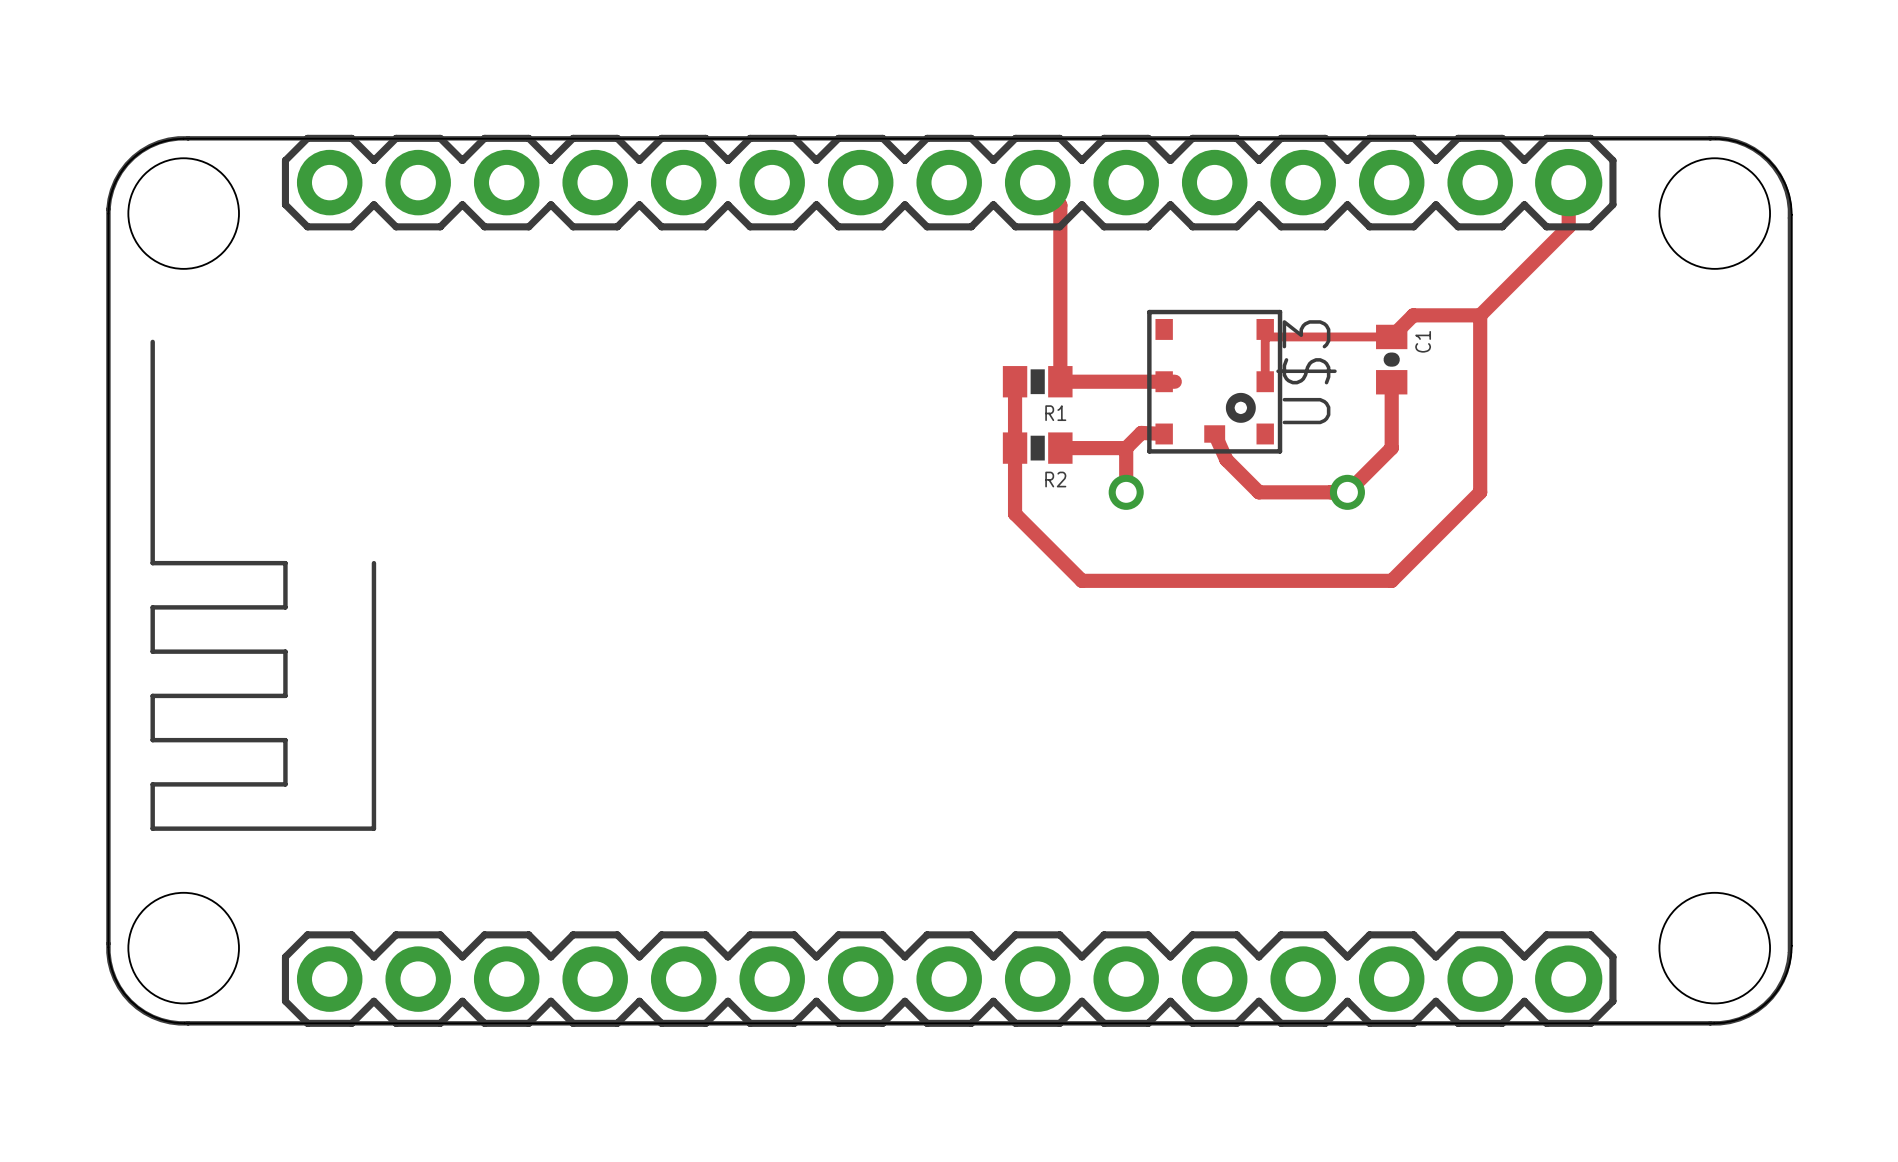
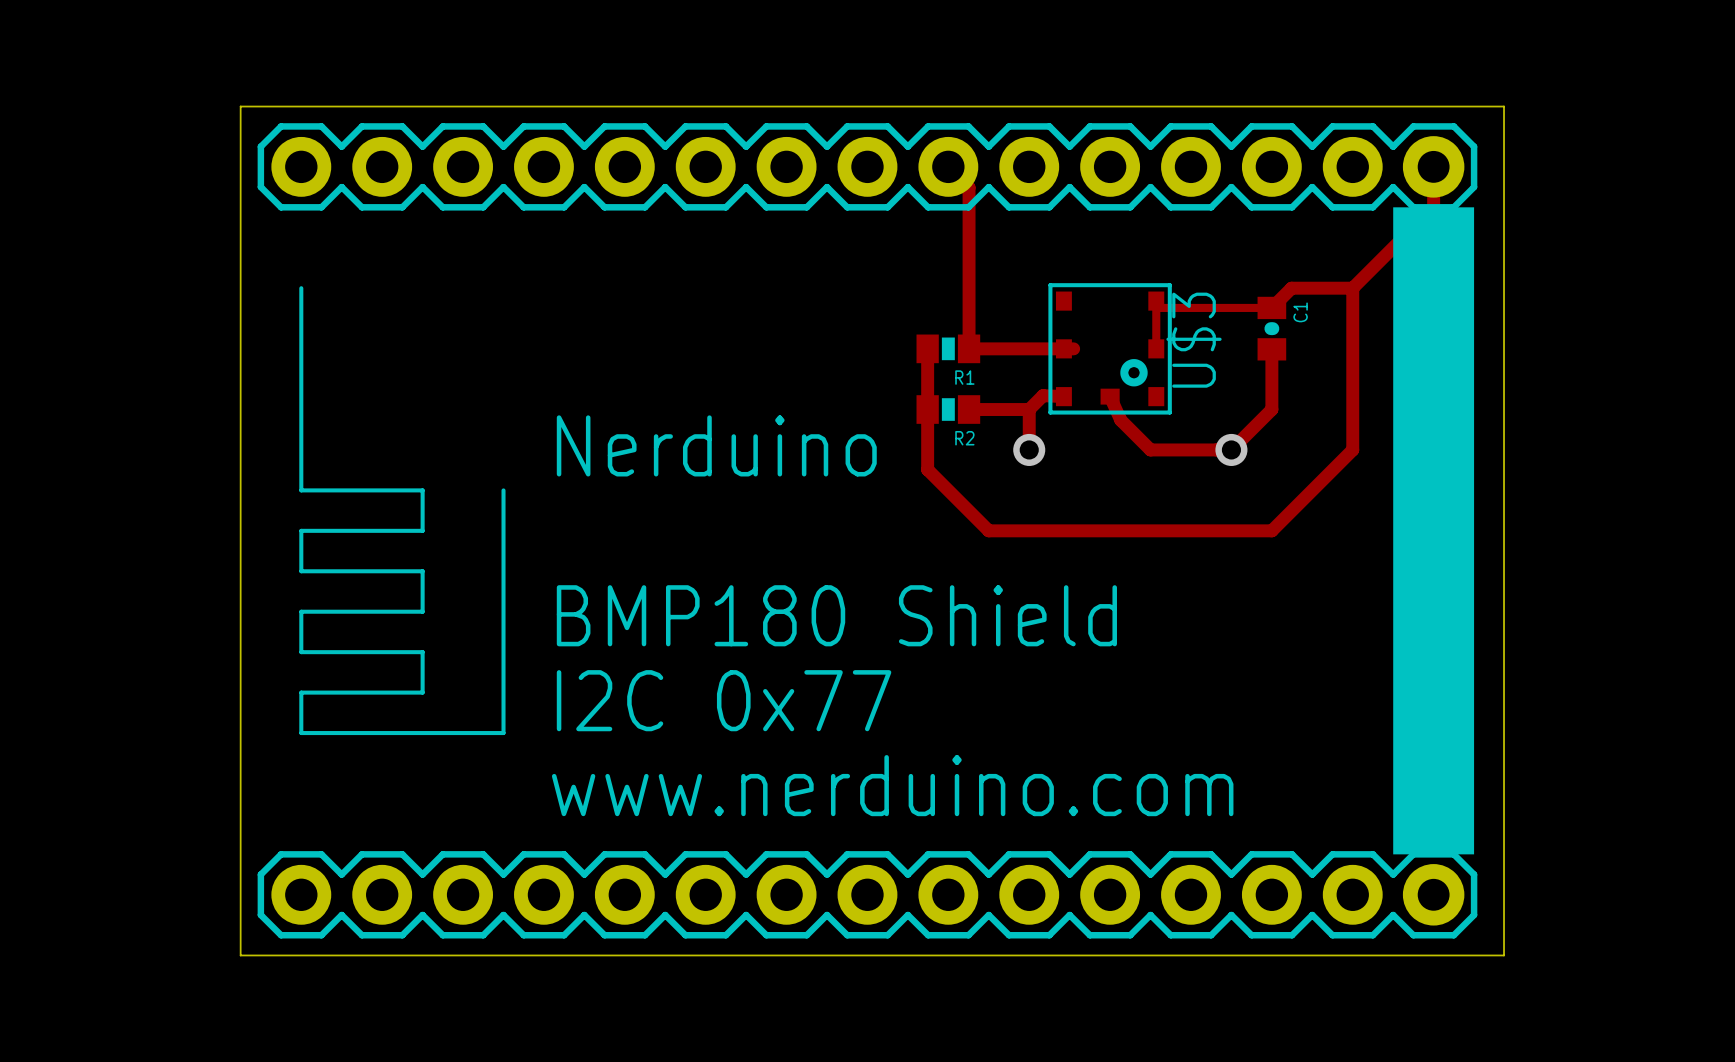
part footprint: [106, 134, 1793, 1027] -> [257, 123, 1478, 939]
board edge: (183, 138) (1715, 138) (1735, 141) (1753, 148) (1769, 160) (1781, 176) (1789, 195) (1791, 214) (1791, 945) (1789, 965) (1781, 984) (1769, 1000) (1752, 1012) (1734, 1020) (1714, 1023) (184, 1023) (164, 1020) (146, 1013) (130, 1001) (118, 985) (111, 966) (108, 947) (108, 213) (114, 185) (130, 160) (154, 144) (183, 138) -> (240, 106) (240, 955) (1504, 955) (1504, 106) (240, 106)
text: none -> Nerduino (716, 445)
text: none -> BMP180 Shield (836, 615)
text: none -> I2C 0x77 (724, 700)
text: none -> www.nerduino.com (892, 785)

